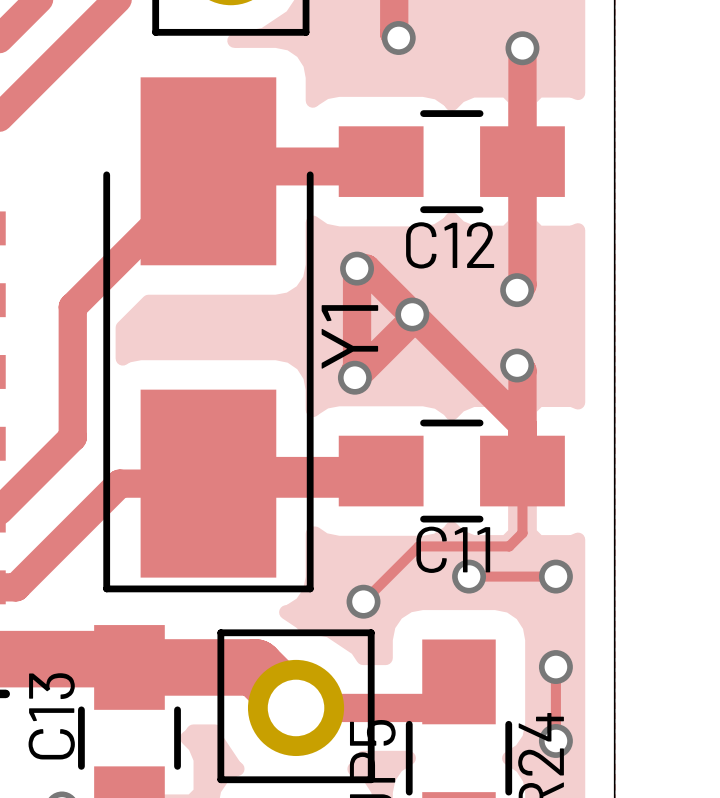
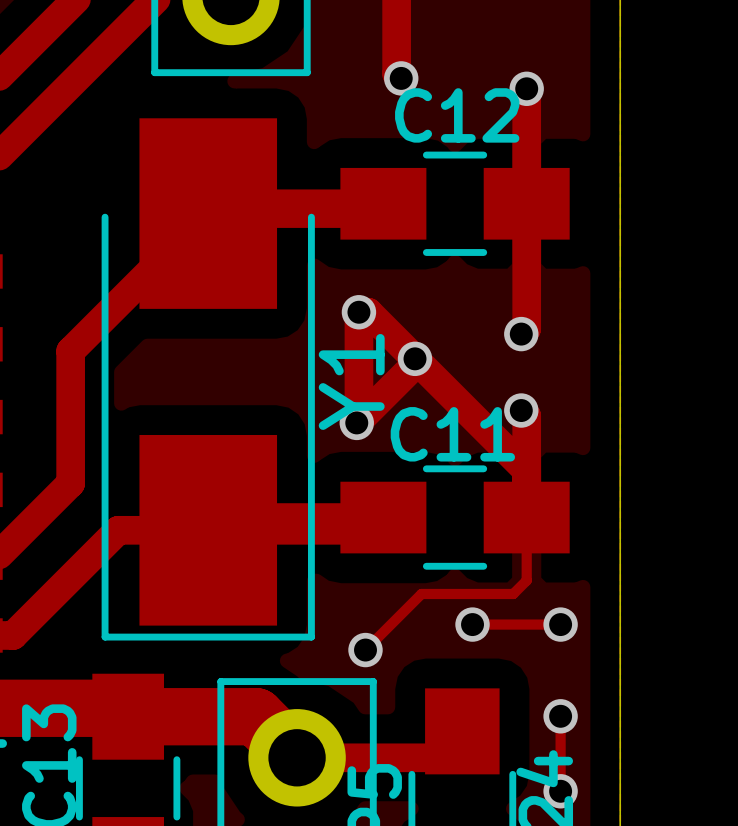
C12 name position: C12 (450, 245) -> C12 (457, 115)
C11 name position: C11 (453, 549) -> C11 (452, 434)

